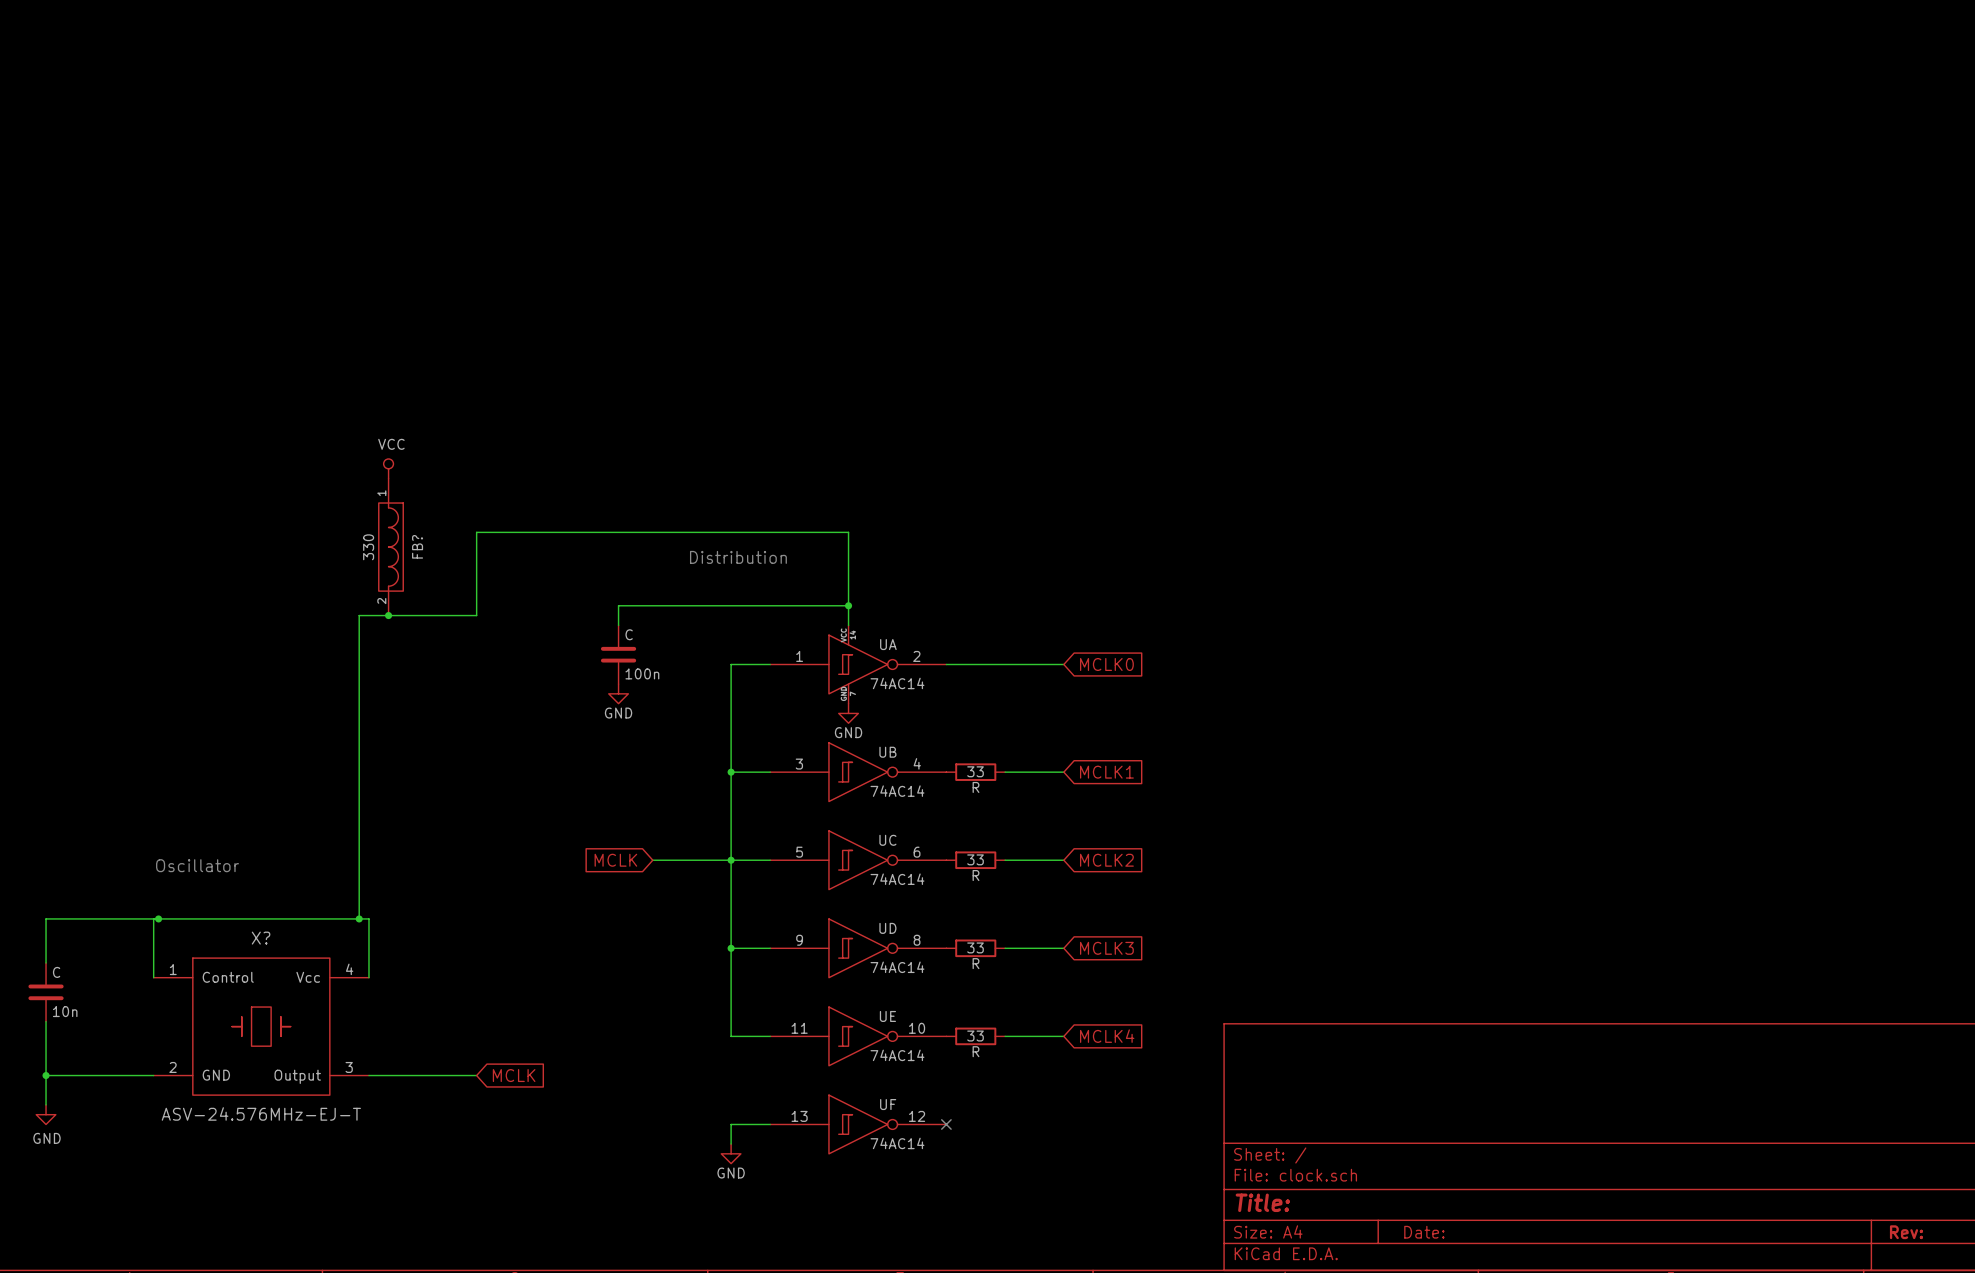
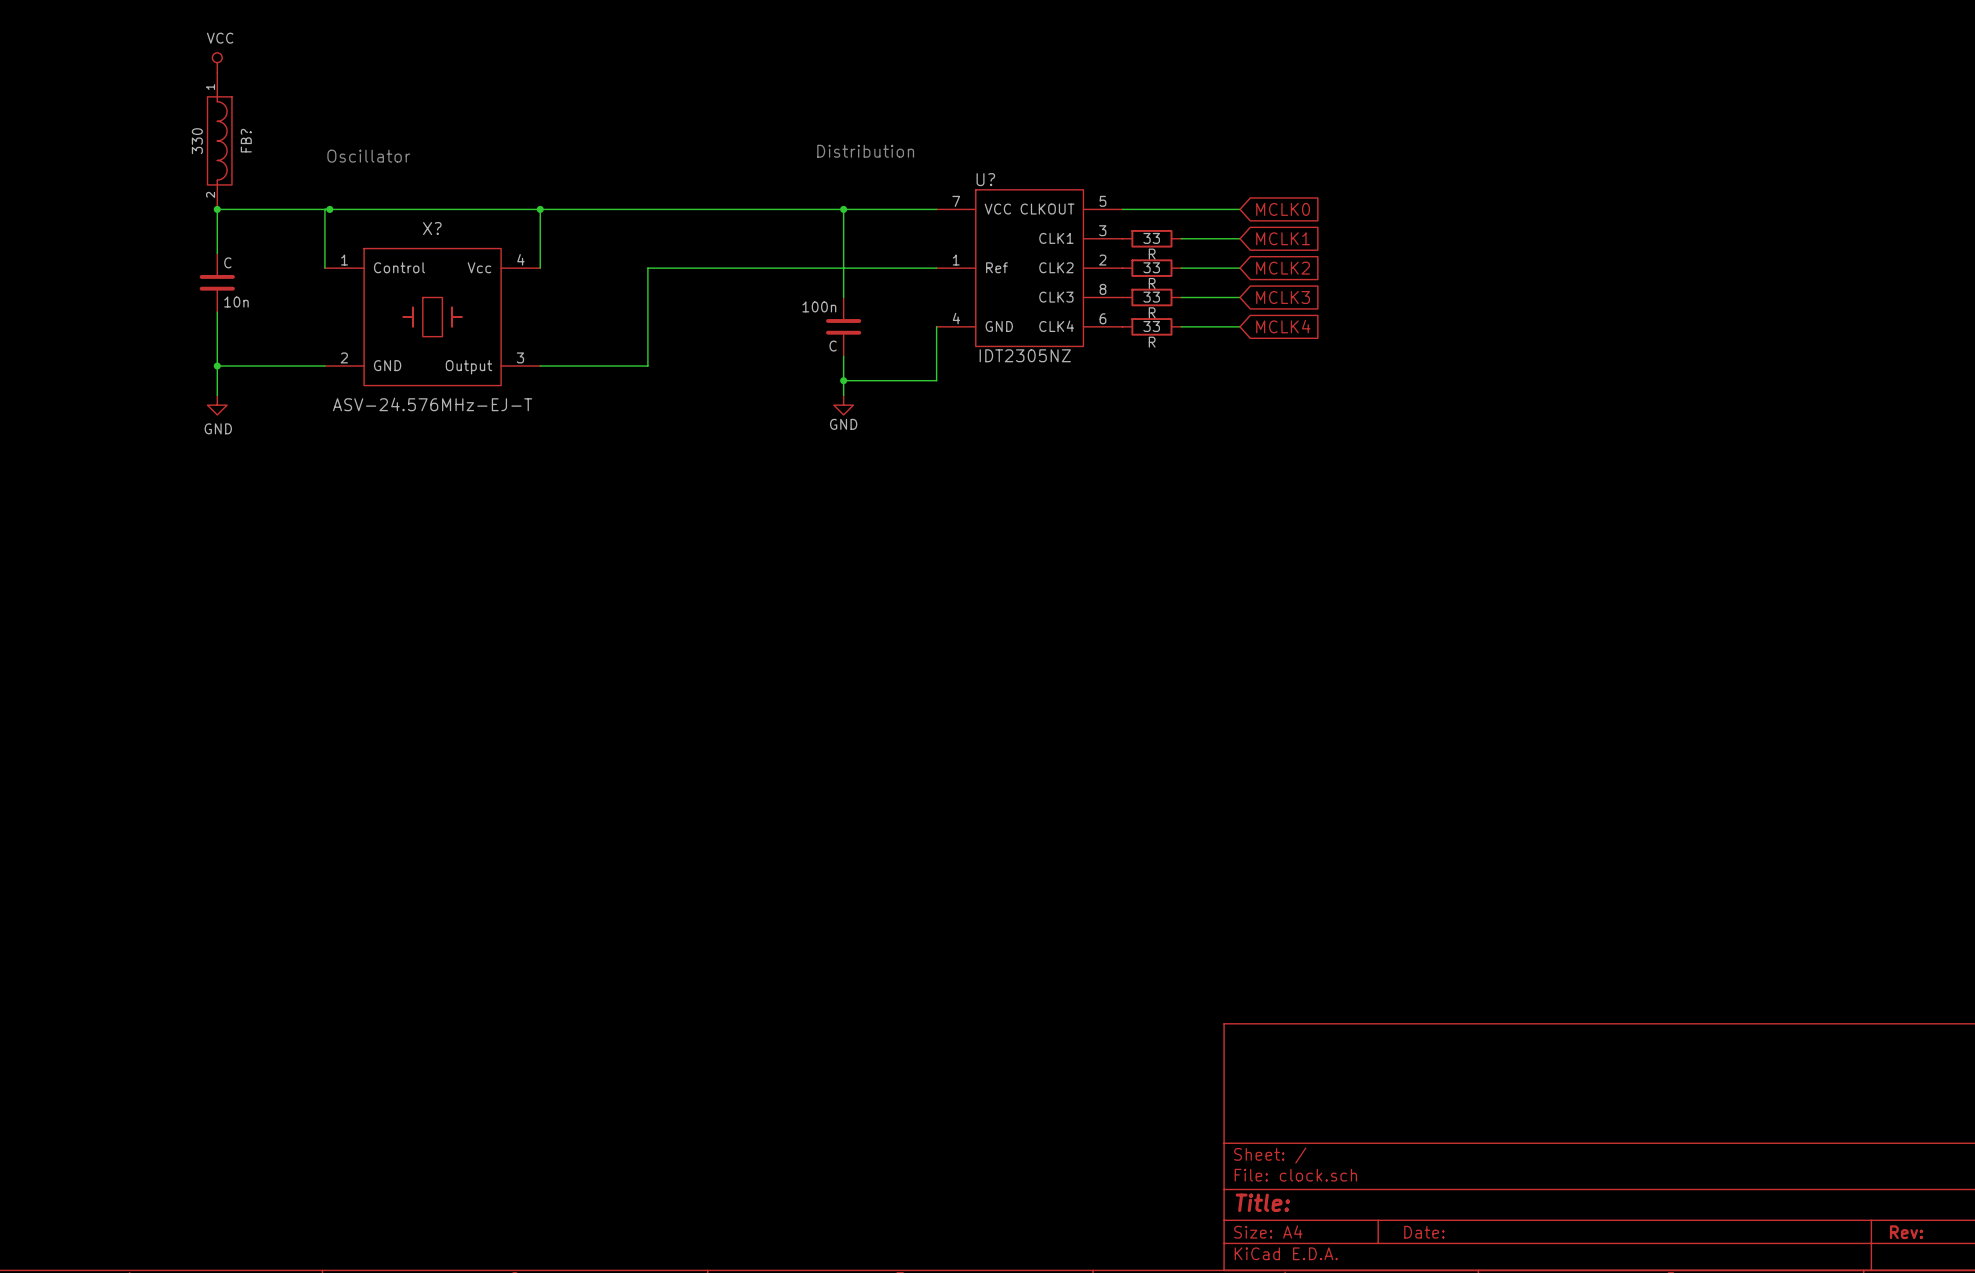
power symbol: none -> VCC (217, 62)
FB?: none -> 330 (219, 140)
text: none -> Distribution (865, 151)
text: none -> Oscillator (368, 156)
junction: none -> (217, 209)
wire: none -> (324, 209) (324, 268)
junction: none -> (329, 209)
wire: none -> (540, 209) (540, 268)
junction: none -> (540, 209)
wire: none -> (843, 209) (843, 297)
junction: none -> (843, 209)
wire: none -> (936, 209) (217, 209) (217, 253)
wire: none -> (1122, 209) (1240, 209)
global label: none -> MCLK0 (1283, 209)
R: none -> 33 (1151, 238)
wire: none -> (1181, 238) (1240, 238)
global label: none -> MCLK1 (1283, 238)
wire: none -> (936, 268) (647, 268) (647, 366) (540, 366)
U?: none -> IDT2305NZ (1029, 268)
R: none -> 33 (1151, 268)
wire: none -> (1181, 268) (1240, 268)
global label: none -> MCLK2 (1283, 268)
C: none -> 10n (217, 282)
R: none -> 33 (1151, 297)
wire: none -> (1181, 297) (1240, 297)
global label: none -> MCLK3 (1283, 297)
wire: none -> (217, 312) (217, 395)
X?: none -> ASV-24.576MHz-EJ-T (432, 317)
C: none -> 100n (843, 326)
wire: none -> (936, 326) (936, 380) (843, 380)
R: none -> 33 (1151, 326)
wire: none -> (1181, 326) (1240, 326)
global label: none -> MCLK4 (1283, 326)
wire: none -> (843, 356) (843, 395)
wire: none -> (217, 366) (324, 366)
junction: none -> (217, 366)
junction: none -> (843, 380)
power symbol: none -> GND (217, 405)
power symbol: none -> GND (843, 405)
power symbol: VCC (388, 468) -> none
FB?: 330 (391, 547) -> none
text: Distribution (738, 557) -> none
wire: (848, 605) (618, 605) (618, 625) -> none
junction: (848, 605) -> none
junction: (388, 615) -> none
wire: (848, 625) (848, 532) (476, 532) (476, 615) (359, 615) (359, 918) -> none
C: 100n (618, 654) -> none
wire: (770, 664) (731, 664) (731, 1036) (770, 1036) -> none
UA: 74AC14 (858, 664) -> none
wire: (946, 664) (1063, 664) -> none
global label: MCLK0 (1106, 664) -> none
power symbol: GND (618, 693) -> none
power symbol: GND (848, 713) -> none
wire: (731, 772) (770, 772) -> none
junction: (731, 772) -> none
UB: 74AC14 (858, 772) -> none
R: 33 (975, 772) -> none
wire: (1005, 772) (1063, 772) -> none
global label: MCLK1 (1106, 772) -> none
global label: MCLK (615, 860) -> none
wire: (652, 860) (770, 860) -> none
junction: (731, 860) -> none
UC: 74AC14 (858, 860) -> none
R: 33 (975, 860) -> none
wire: (1005, 860) (1063, 860) -> none
global label: MCLK2 (1106, 860) -> none
text: Oscillator (197, 865) -> none
wire: (153, 918) (153, 977) -> none
junction: (158, 918) -> none
junction: (359, 918) -> none
wire: (731, 948) (770, 948) -> none
junction: (731, 948) -> none
UD: 74AC14 (858, 948) -> none
R: 33 (975, 948) -> none
wire: (1005, 948) (1063, 948) -> none
global label: MCLK3 (1106, 948) -> none
wire: (46, 962) (46, 918) (368, 918) (368, 977) -> none
C: 10n (46, 992) -> none
wire: (46, 1021) (46, 1104) -> none
X?: ASV-24.576MHz-EJ-T (261, 1026) -> none
UE: 74AC14 (858, 1036) -> none
R: 33 (975, 1036) -> none
wire: (1005, 1036) (1063, 1036) -> none
global label: MCLK4 (1107, 1036) -> none
wire: (46, 1075) (153, 1075) -> none
junction: (46, 1075) -> none
wire: (368, 1075) (476, 1075) -> none
global label: MCLK (514, 1075) -> none
power symbol: GND (46, 1114) -> none
wire: (770, 1124) (731, 1124) (731, 1144) -> none
UF: 74AC14 (858, 1124) -> none
no-connect mark: (946, 1124) -> none
power symbol: GND (731, 1153) -> none

